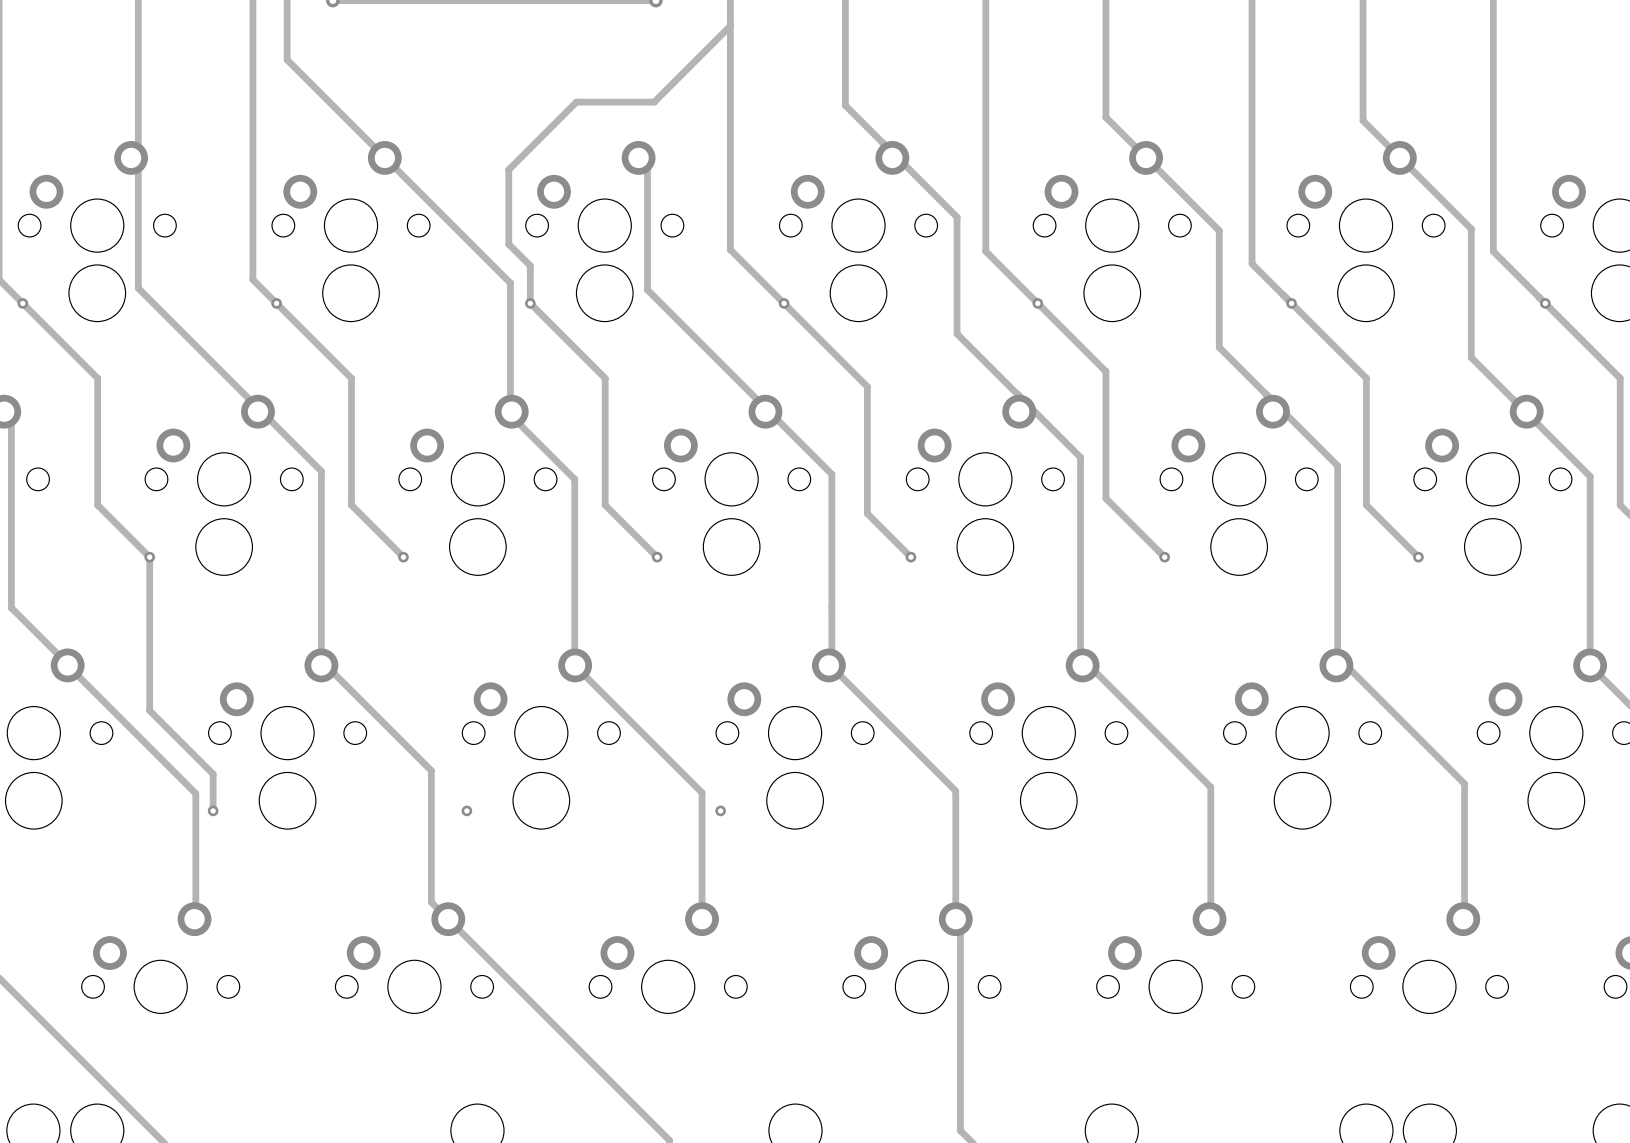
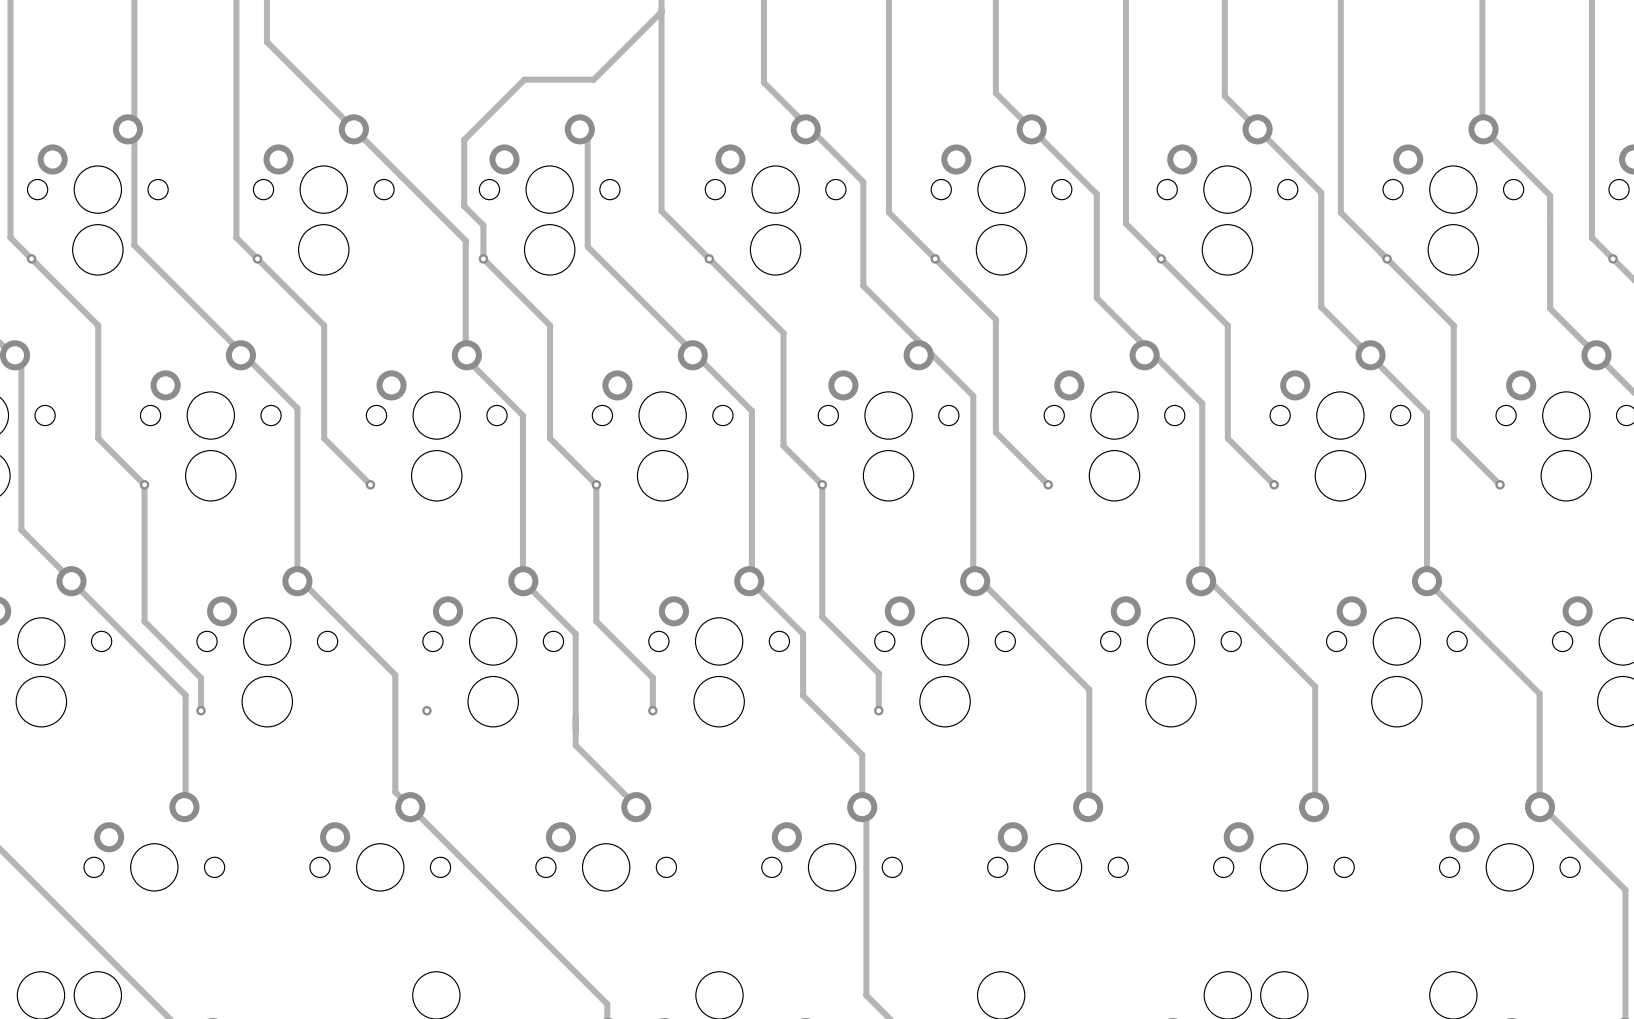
track: none -> (596, 484) (596, 621) (652, 677) (652, 710)
track: none -> (822, 484) (822, 616) (878, 673) (878, 710)
track: (633, 724) (702, 792) (702, 919) -> (575, 633) (575, 745) (635, 805)
track: (889, 724) (955, 791) (955, 860) -> (803, 633) (803, 695) (862, 754)
via: none -> (878, 710)

